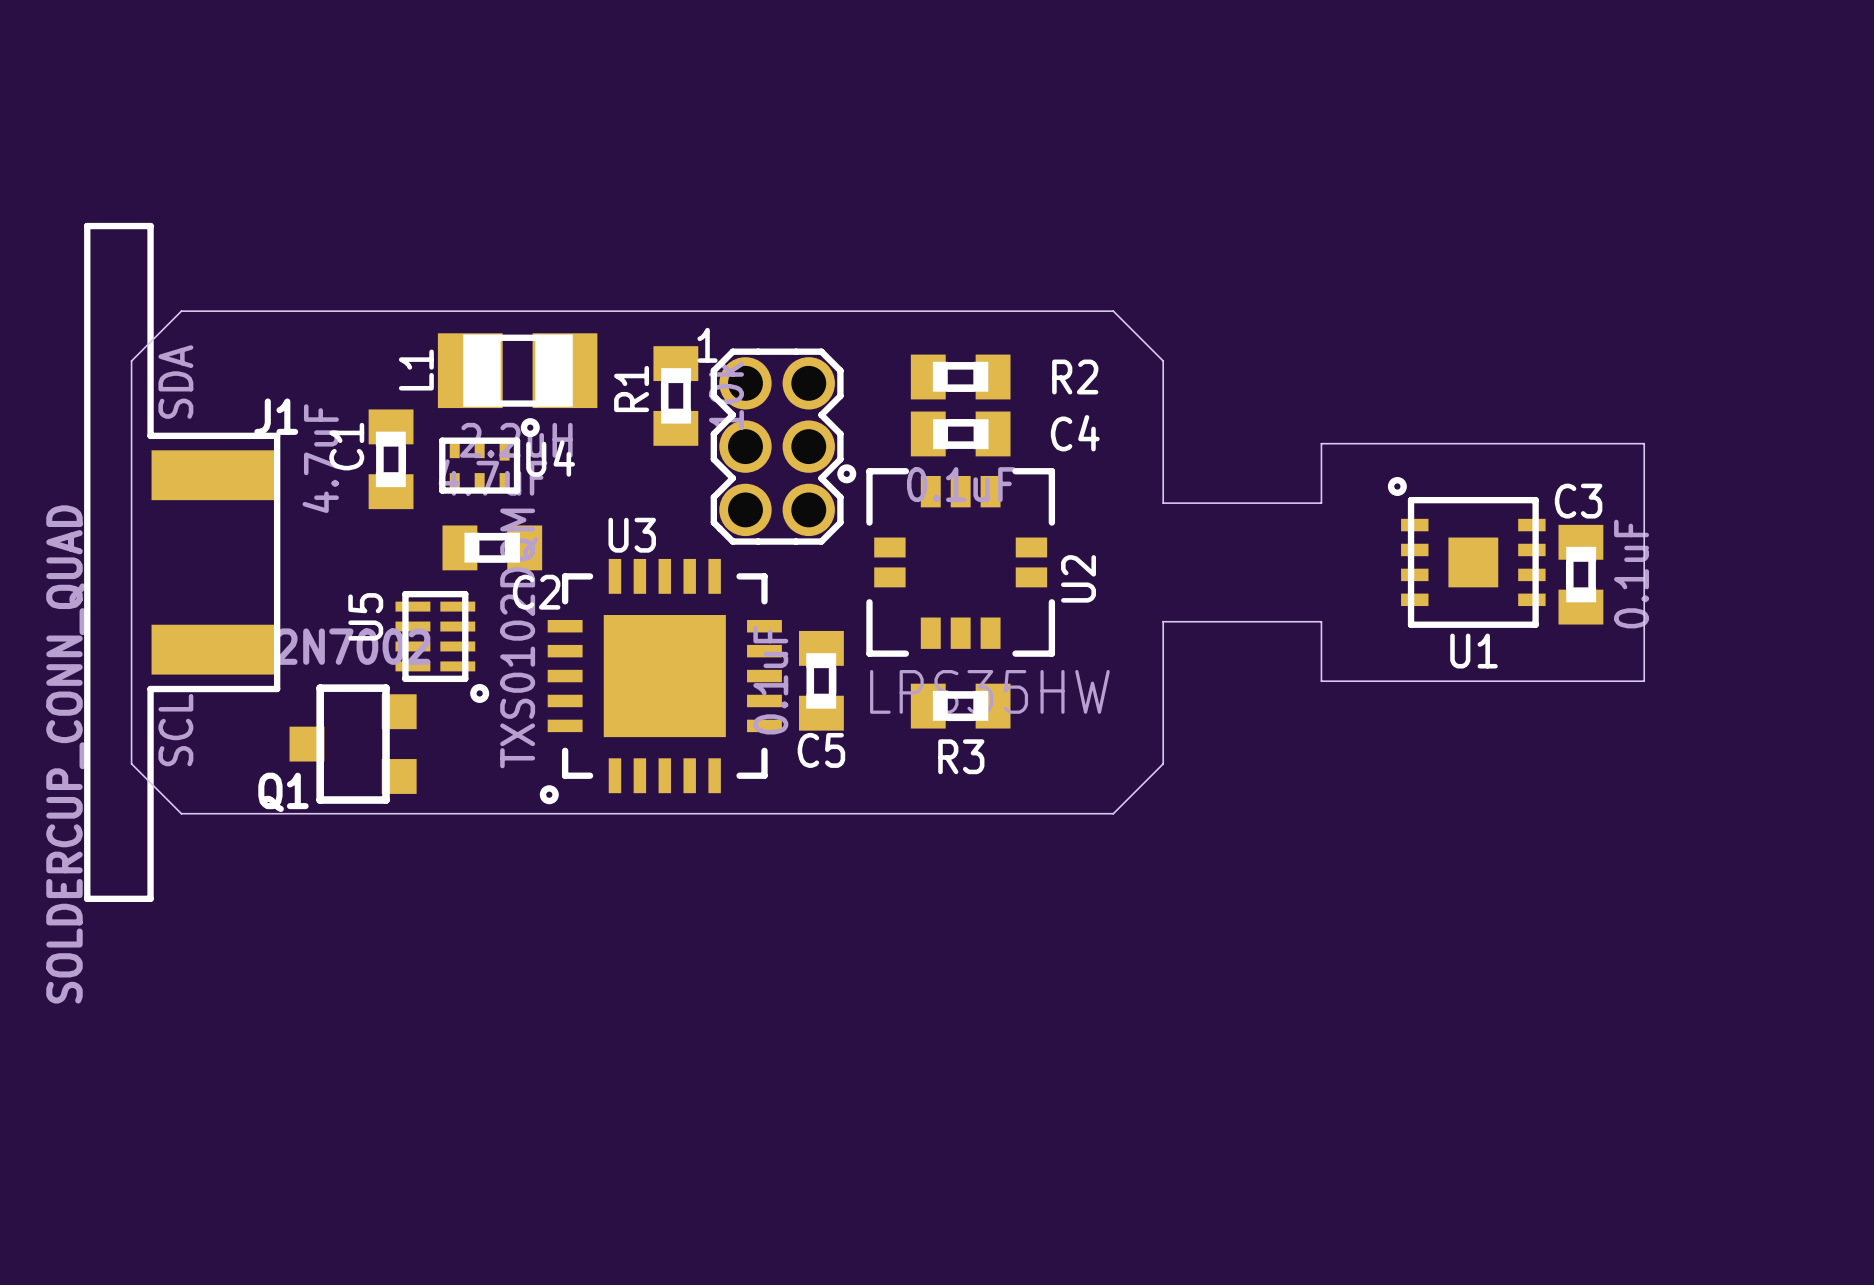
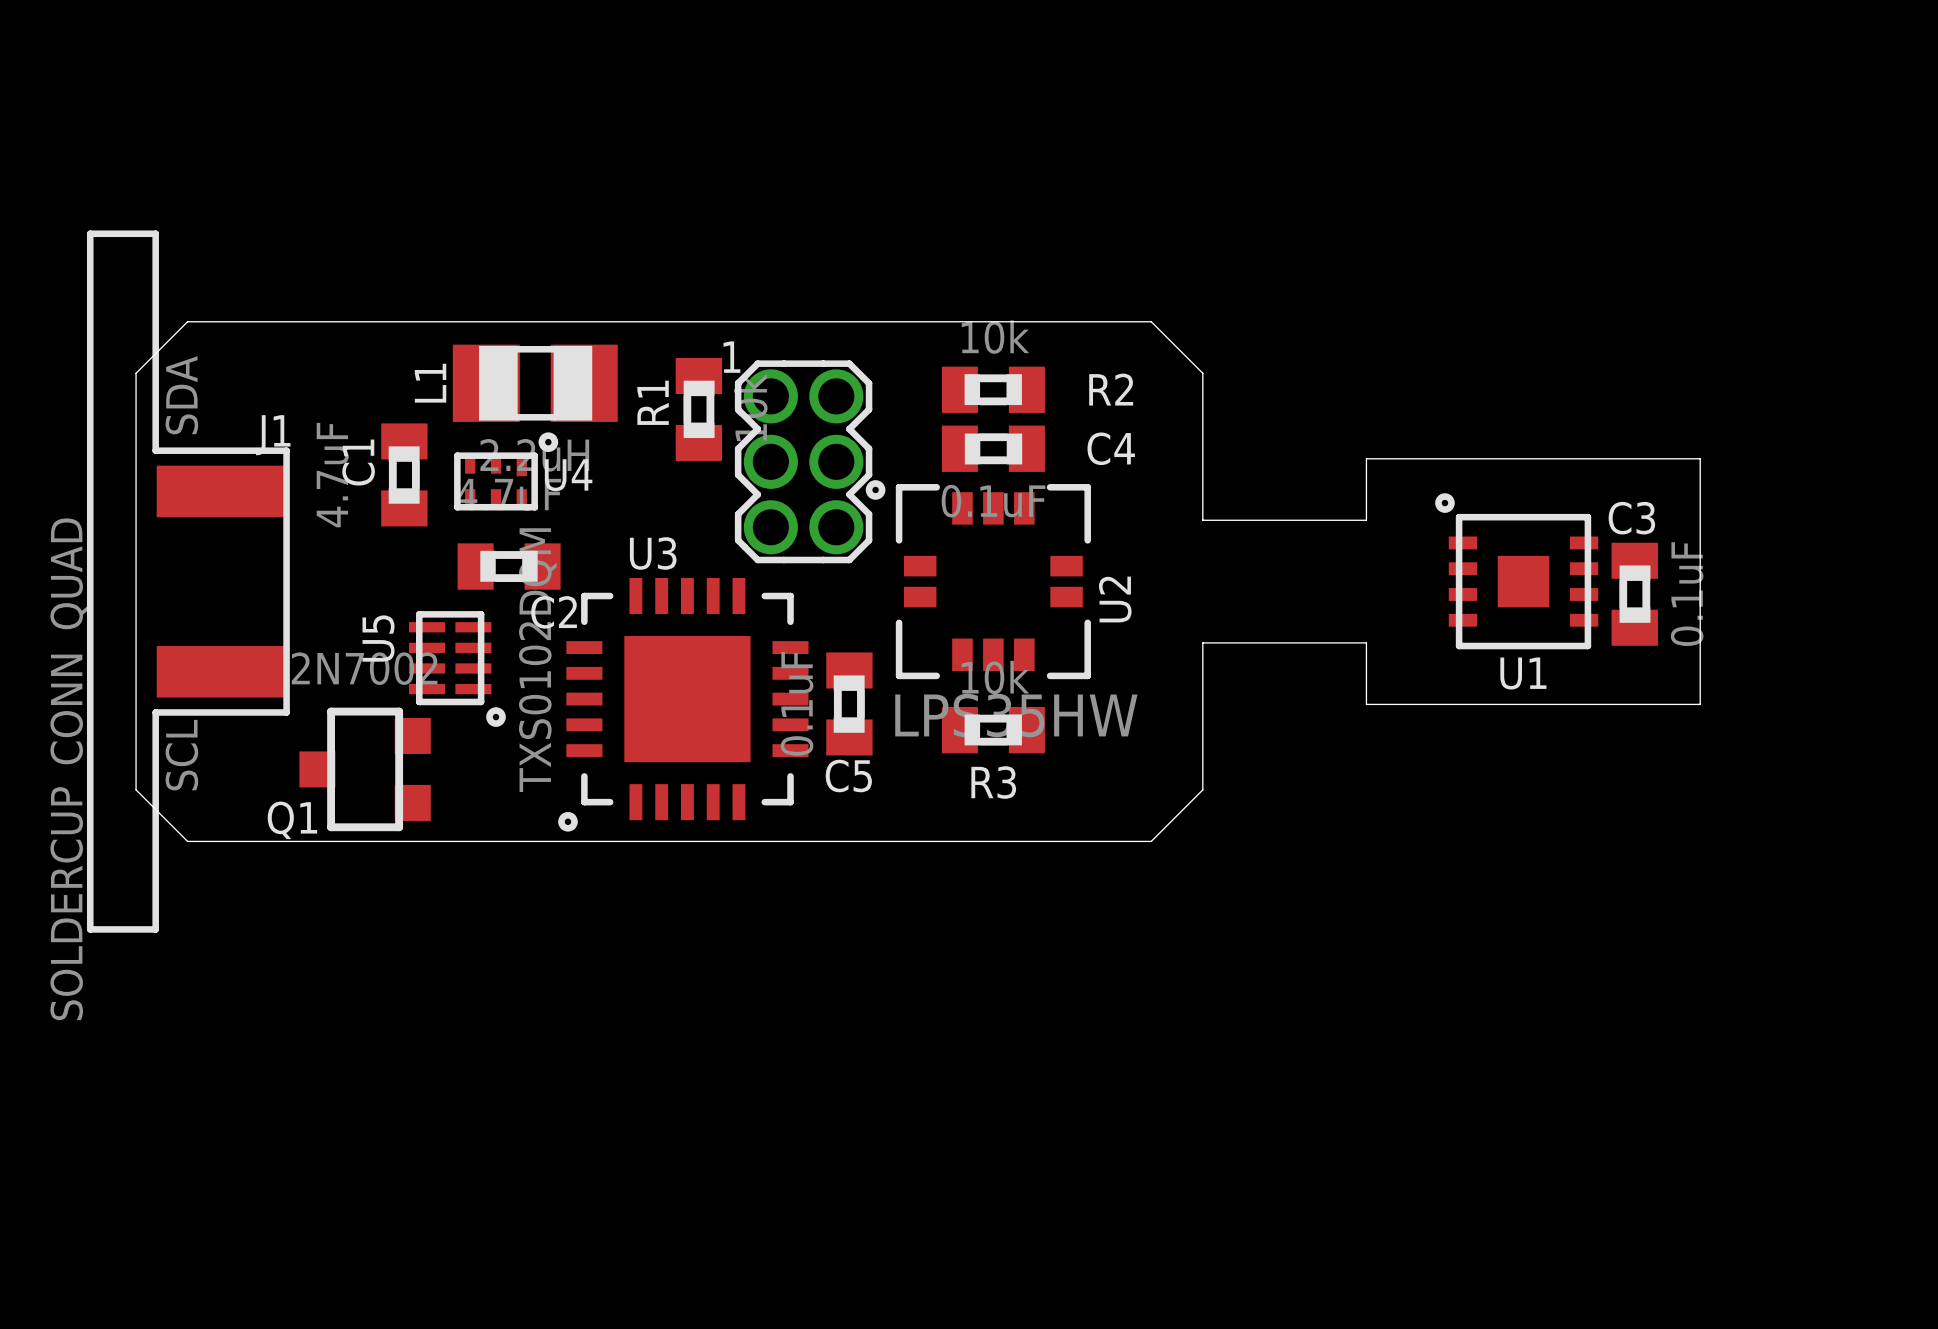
R2 value: none -> 10k (995, 337)
R3 value: none -> 10k (995, 677)

